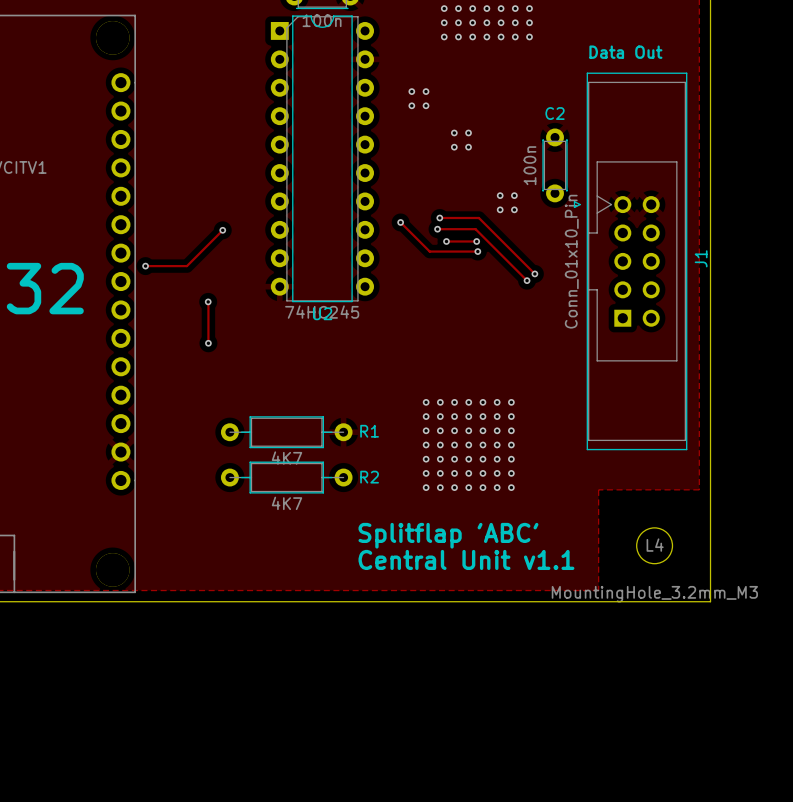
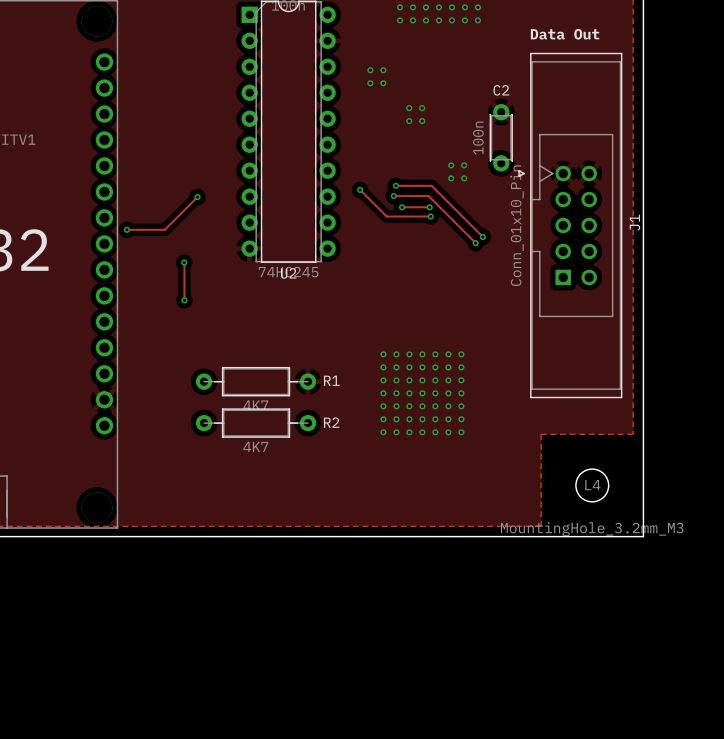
text: Splitflap 'ABC' (448, 535) -> none
text: Central Unit v1.1 (466, 559) -> none

